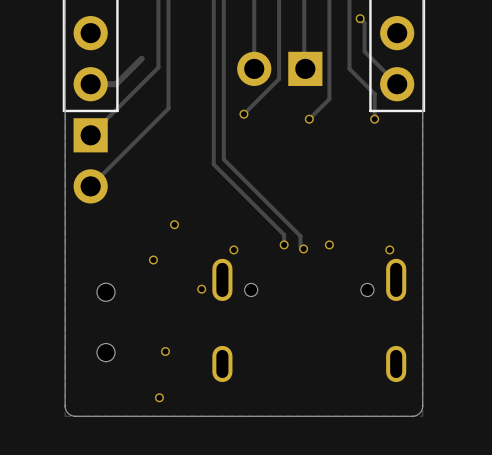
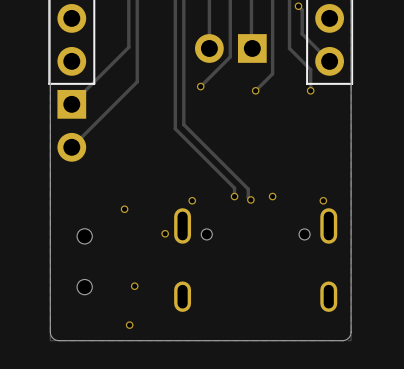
track: (141, 58) (116, 84) (90, 84) -> none
via: (174, 224) -> none

